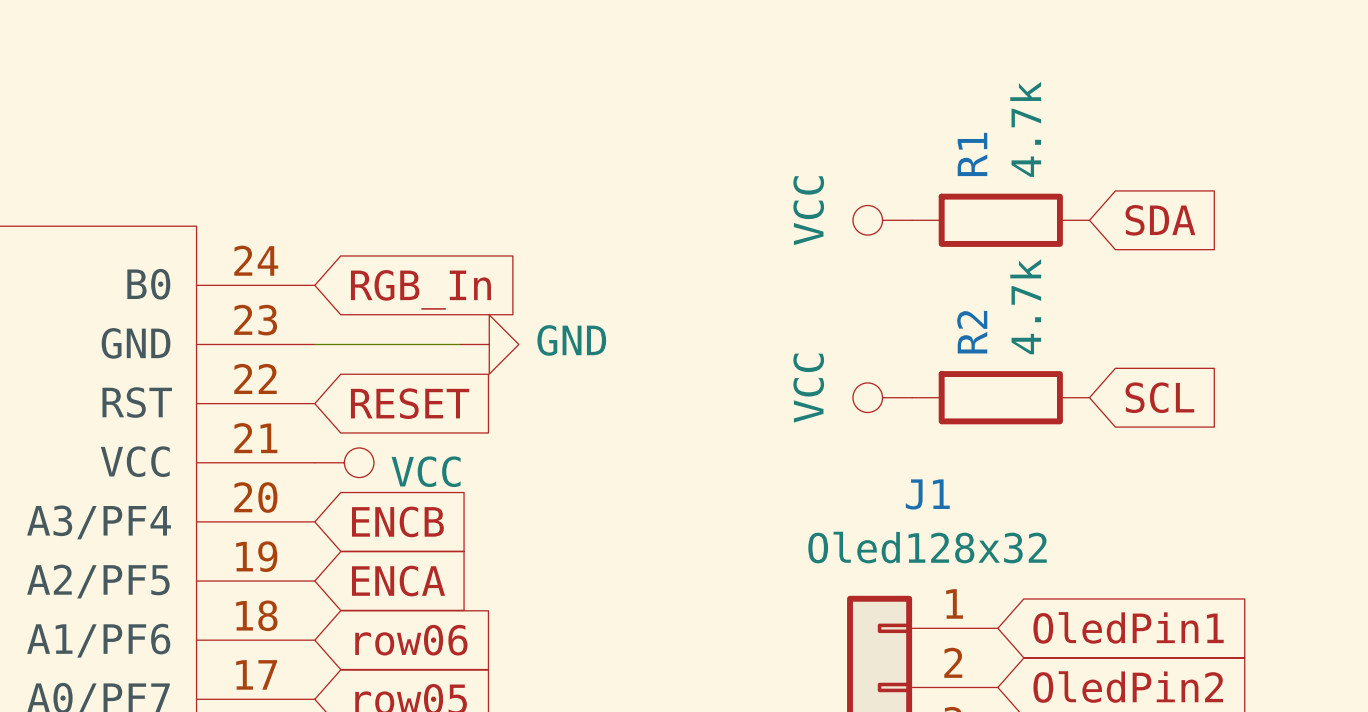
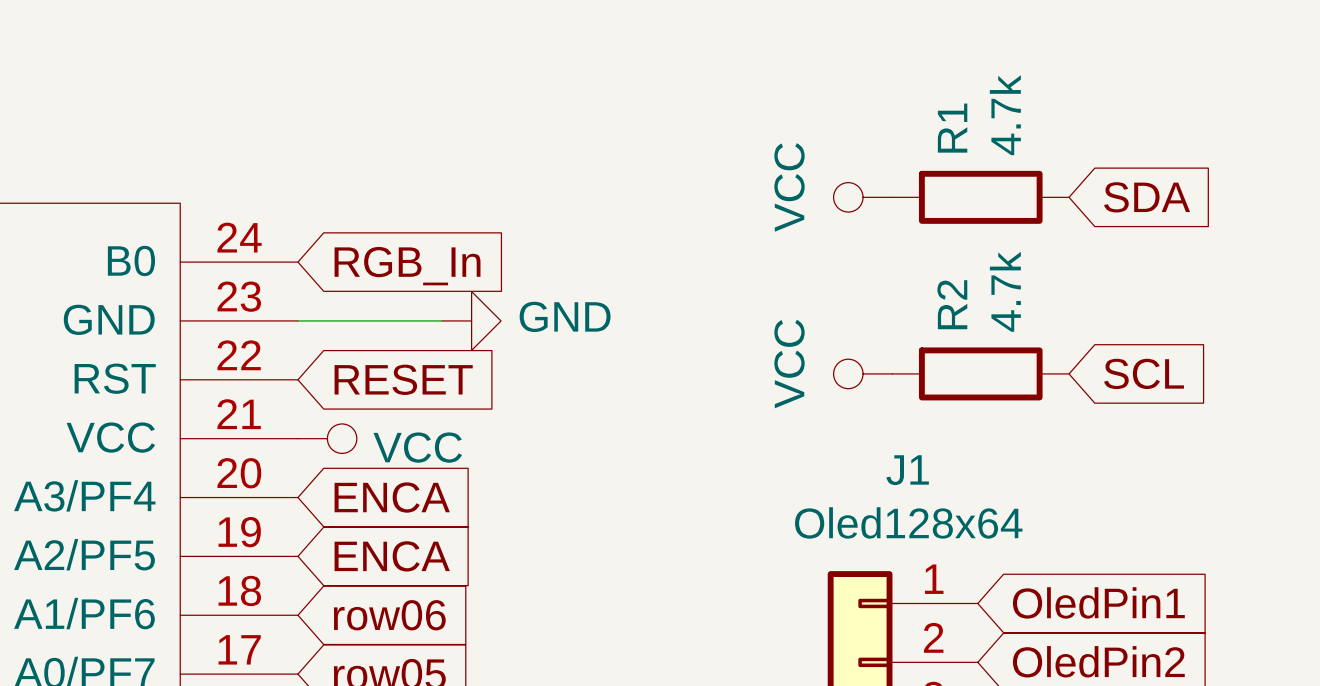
global label: ENCB (397, 521) -> ENCA (392, 497)
J1 value: Oled128x32 (927, 547) -> Oled128x64 (908, 522)

